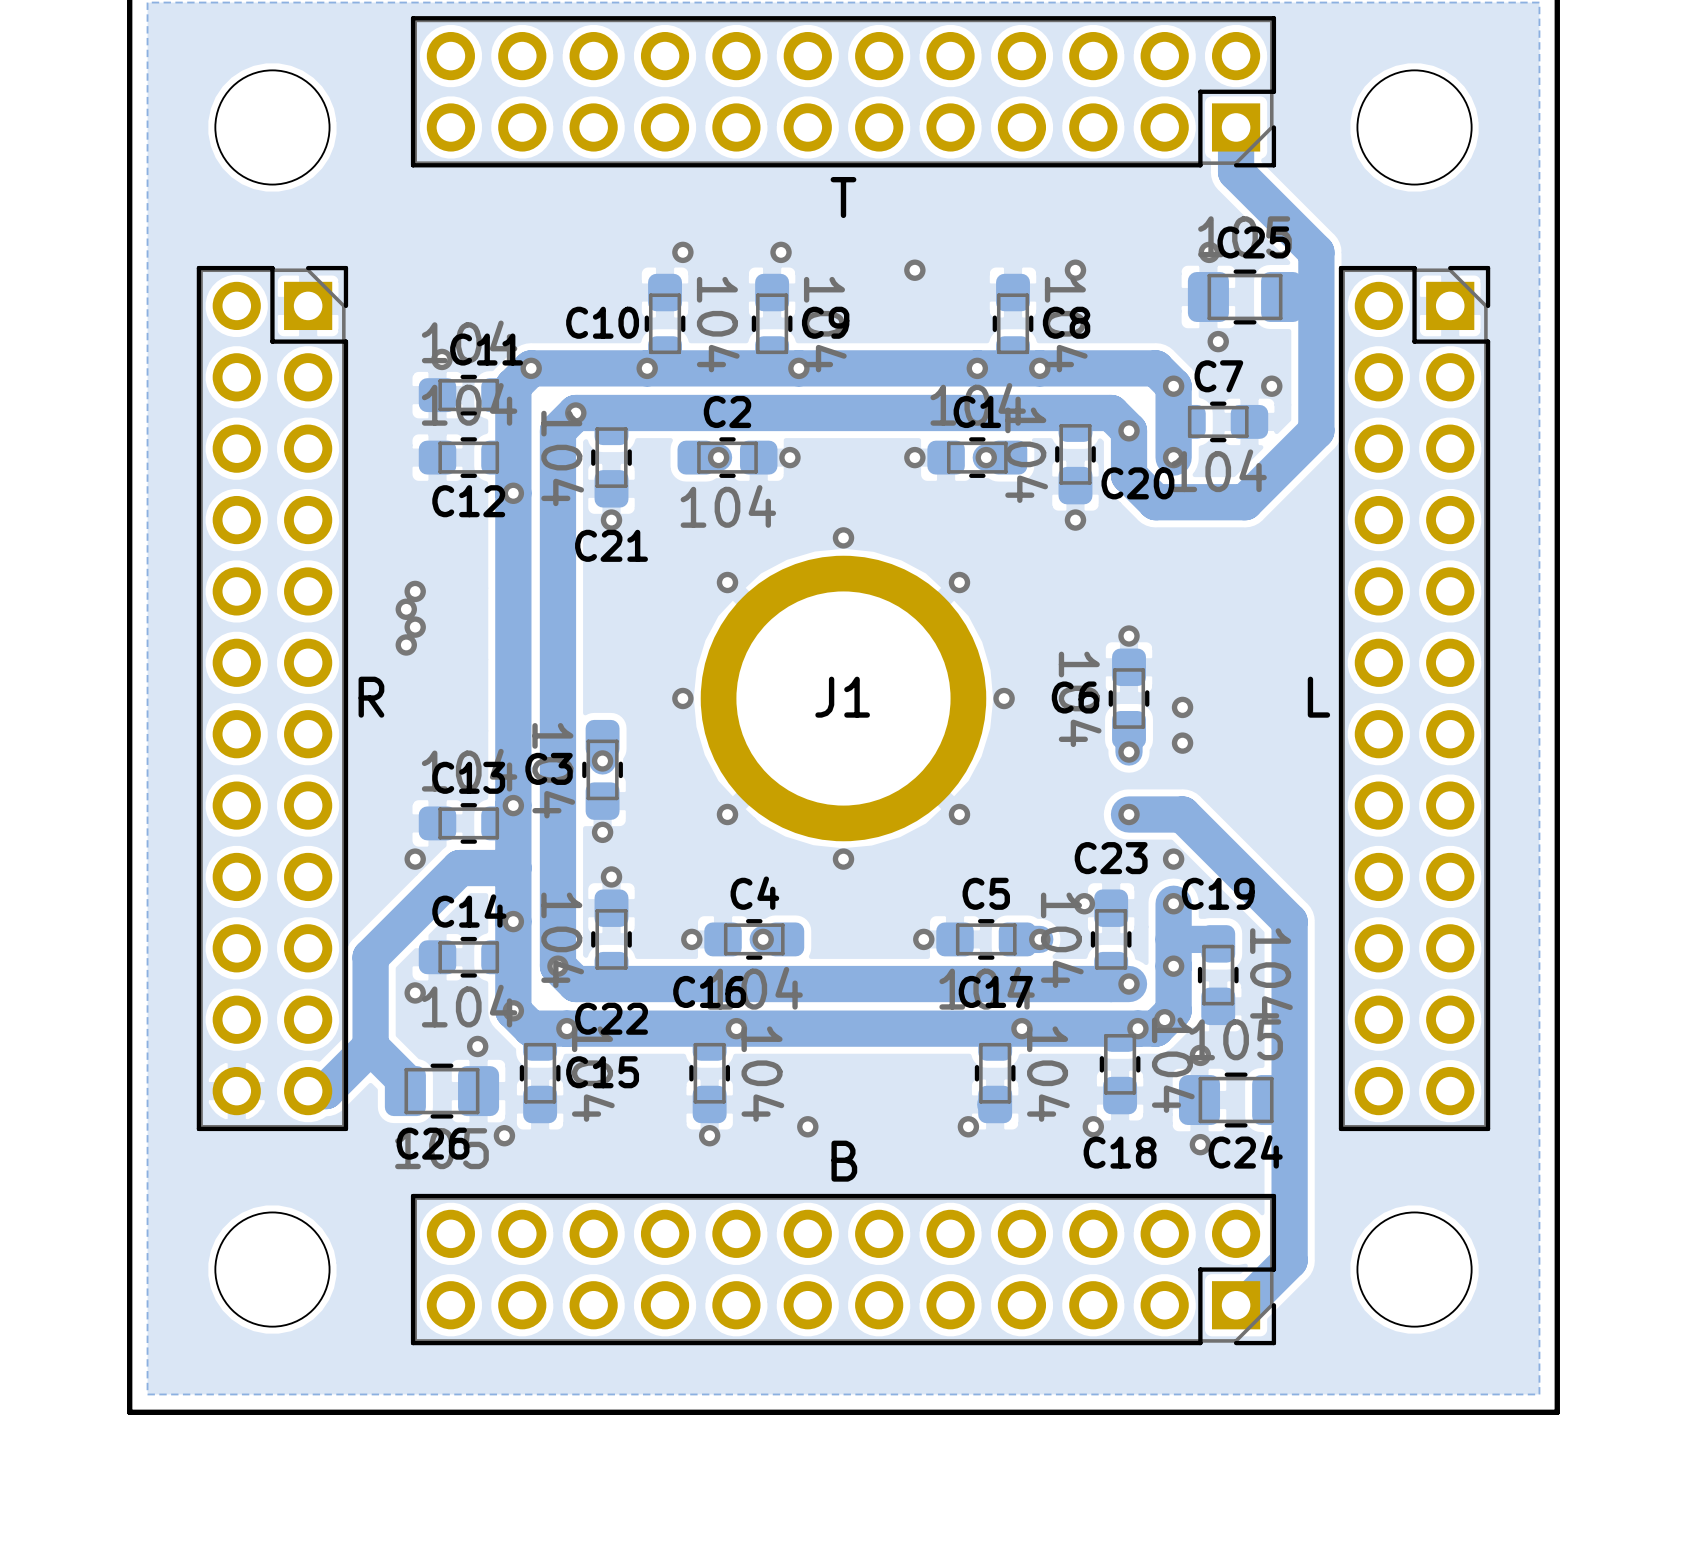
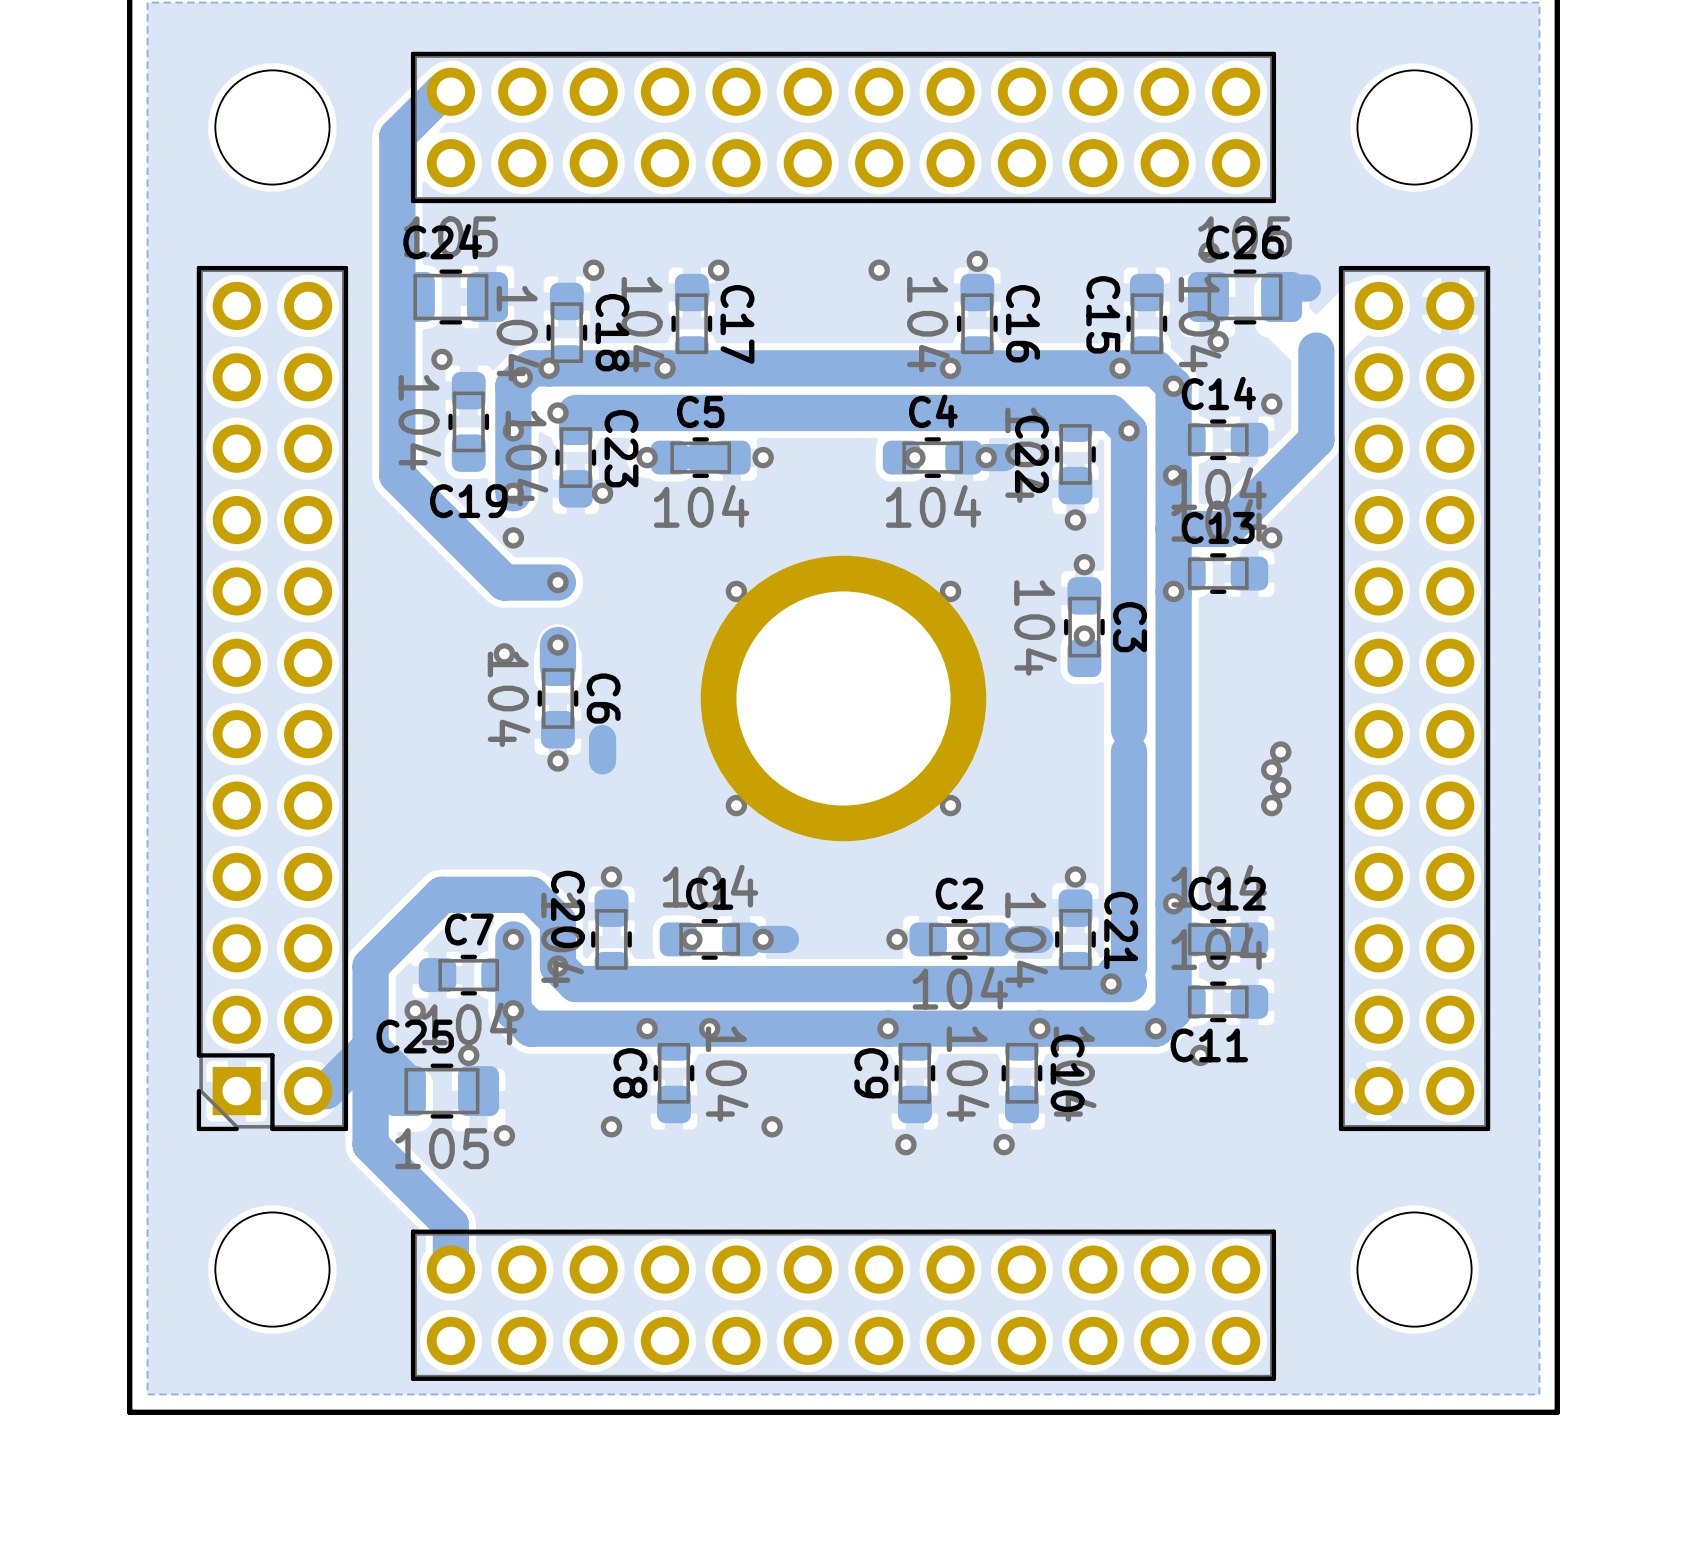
track: none -> (450, 91) (441, 91) (397, 136) (397, 475) (504, 582) (557, 582)
track: (1236, 127) (1236, 172) (1316, 252) (1316, 350) -> none
C25 name: C25 (1253, 242) -> C26 (1245, 242)
via: (682, 252) -> none
via: (781, 252) -> none
via: none -> (977, 261)
via: none -> (593, 270)
via: none -> (718, 270)
via: none -> (879, 270)
via: (914, 270) -> none
via: (1075, 270) -> none
C10 name rotation: 0° (602, 322) -> 90° clockwise (1067, 1073)
C10 name position: C10 (602, 322) -> C10 (1067, 1073)
C9 name rotation: 0° (825, 322) -> 90° clockwise (871, 1073)
C9 name position: C9 (825, 322) -> C9 (871, 1073)
C8 name rotation: 0° (1066, 322) -> 90° clockwise (630, 1073)
C8 name position: C8 (1066, 322) -> C8 (630, 1073)
C10 position: (665, 323) -> (1021, 1073)
C9 position: (772, 323) -> (914, 1073)
C8 position: (1013, 323) -> (673, 1073)
C11 name position: C11 (486, 349) -> C11 (1209, 1045)
via: (531, 368) -> none
via: none -> (549, 368)
via position: (647, 368) -> (665, 368)
via: (798, 368) -> none
via position: (977, 368) -> (950, 368)
via: (1039, 368) -> none
via: none -> (1120, 368)
via: none -> (522, 377)
via position: (1271, 386) -> (1271, 404)
C11 position: (468, 395) -> (1218, 1001)
track: (575, 412) (557, 430) (557, 644) -> none
via position: (575, 412) -> (557, 412)
C7 position: (1218, 421) -> (468, 975)
via: none -> (513, 430)
track: (1316, 430) (1245, 502) (1155, 502) (1129, 475) -> (1316, 430) (1316, 439) (1227, 528) (1173, 528)
C12 position: (468, 457) -> (1218, 939)
C21 position: (611, 457) -> (1075, 939)
via: none -> (647, 457)
via: (718, 457) -> none
C2 position: (727, 457) -> (959, 939)
via: none -> (763, 457)
via: (789, 457) -> none
C1 position: (977, 457) -> (709, 939)
via position: (1173, 457) -> (1173, 475)
C20 name: C20 (1137, 483) -> C22 (1031, 454)
track: (513, 493) (513, 939) -> (1173, 457) (1173, 903)
C12 name position: C12 (468, 501) -> C12 (1227, 893)
via position: (611, 520) -> (602, 493)
via: none -> (513, 537)
via: (843, 537) -> none
via: none -> (1271, 537)
C21 name rotation: 0° (611, 545) -> 90° clockwise (1121, 930)
C21 name position: C21 (611, 545) -> C21 (1121, 930)
via: none -> (1084, 564)
via: none -> (557, 582)
via position: (727, 582) -> (736, 591)
via position: (959, 582) -> (950, 591)
via: (415, 591) -> none
via: none -> (1173, 591)
via: (406, 609) -> none
via: (415, 627) -> none
via: none -> (1084, 636)
via: (1129, 636) -> none
via: (406, 644) -> none
via: none -> (557, 644)
via: none -> (504, 653)
track: (557, 667) (557, 921) -> (1129, 475) (1129, 729)
J1: (843, 680) -> none
C6 name rotation: 0° (1075, 697) -> 90° clockwise (603, 698)
C6 name position: C6 (1075, 697) -> C6 (603, 698)
via: (682, 698) -> none
via: (1004, 698) -> none
C6 position: (1129, 698) -> (557, 698)
via: (1182, 707) -> none
part: none -> (843, 716)
via: (1182, 743) -> none
track: none -> (1129, 752) (1129, 966) (1111, 984)
via: (1129, 752) -> none
via: none -> (1280, 752)
via: none -> (557, 760)
via: (602, 760) -> none
C3 name rotation: 0° (549, 768) -> 90° clockwise (1130, 627)
C3 name position: C3 (549, 768) -> C3 (1130, 627)
C3 position: (602, 769) -> (1084, 627)
via: none -> (1271, 769)
via: none -> (1280, 787)
via: (513, 805) -> none
via: none -> (1271, 805)
via position: (727, 814) -> (736, 805)
via position: (959, 814) -> (950, 805)
track: (1129, 814) (1182, 814) (1289, 921) (1289, 1260) (1245, 1305) (1236, 1305) -> none
via: (1129, 814) -> none
C13 position: (468, 823) -> (1218, 573)
via: (602, 832) -> none
C23 name rotation: 0° (1111, 858) -> 90° clockwise (621, 448)
via: (415, 859) -> none
via: (843, 859) -> none
via: (1173, 859) -> none
track: (513, 868) (459, 868) (370, 957) (370, 966) -> (557, 921) (531, 894) (441, 894) (370, 966)
C19 name position: C19 (1218, 893) -> C19 (468, 501)
via position: (1084, 903) -> (1075, 876)
via position: (513, 921) -> (513, 939)
C4 position: (754, 939) -> (932, 457)
via: none -> (897, 939)
via: (923, 939) -> none
via: none -> (968, 939)
C5 position: (986, 939) -> (700, 457)
via: (1039, 939) -> none
C23 position: (1111, 939) -> (575, 457)
C14 position: (468, 957) -> (1218, 439)
via: (1173, 966) -> none
C19 position: (1218, 975) -> (468, 421)
C19 value position: 104 (1271, 975) -> 104 (419, 422)
via position: (1129, 984) -> (1111, 984)
C16 name rotation: 0° (709, 991) -> 90° clockwise (1023, 323)
C17 name rotation: 0° (995, 991) -> 90° clockwise (737, 324)
via position: (415, 992) -> (415, 1010)
C22 name: C22 (611, 1018) -> C20 (567, 909)
via: (1164, 1019) -> none
via: (566, 1028) -> none
via: none -> (647, 1028)
via position: (736, 1028) -> (709, 1028)
via: none -> (888, 1028)
via position: (1021, 1028) -> (1039, 1028)
via: (1137, 1028) -> none
via: none -> (1155, 1028)
track: none -> (370, 1046) (370, 1144) (450, 1224) (450, 1269)
via position: (477, 1046) -> (468, 1055)
C18 position: (1120, 1064) -> (566, 332)
C18 value position: 104 (1173, 1065) -> 104 (518, 333)
C15 name rotation: 0° (602, 1072) -> 90° clockwise (1103, 314)
C15 name position: C15 (602, 1072) -> C15 (1103, 314)
C15 position: (540, 1073) -> (1146, 323)
C16 position: (709, 1073) -> (977, 323)
C17 position: (995, 1073) -> (691, 323)
C16 value position: 104 (762, 1074) -> 104 (928, 324)
C17 value position: 104 (1048, 1074) -> 104 (642, 324)
C24 position: (1236, 1100) -> (450, 296)
via: none -> (611, 1126)
via: none -> (772, 1126)
via: (807, 1126) -> none
via: (968, 1126) -> none
via: (1093, 1126) -> none
via: (709, 1135) -> none
C26 name: C26 (433, 1143) -> C25 (415, 1036)
via: none -> (905, 1144)
via: none -> (1004, 1144)
via: (1200, 1144) -> none
C24 name position: C24 (1245, 1151) -> C24 (442, 241)
C18 name rotation: 0° (1120, 1152) -> 90° clockwise (612, 332)
C18 name position: C18 (1120, 1152) -> C18 (612, 332)

